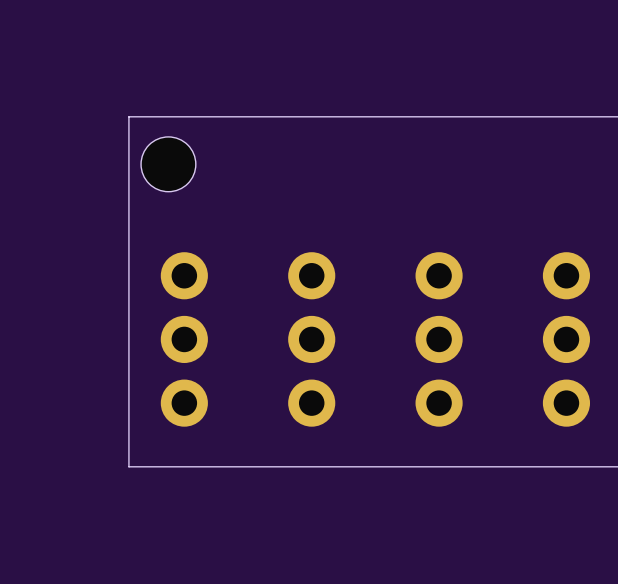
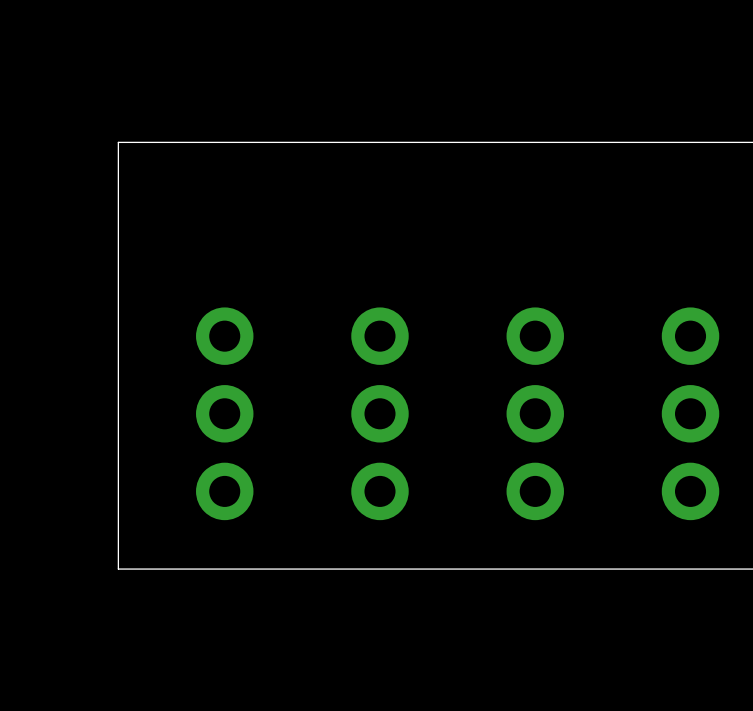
board edge: (128, 116) (128, 466) -> (157, 142) (118, 142) (118, 569) (157, 569)
hole: (168, 164) -> none

